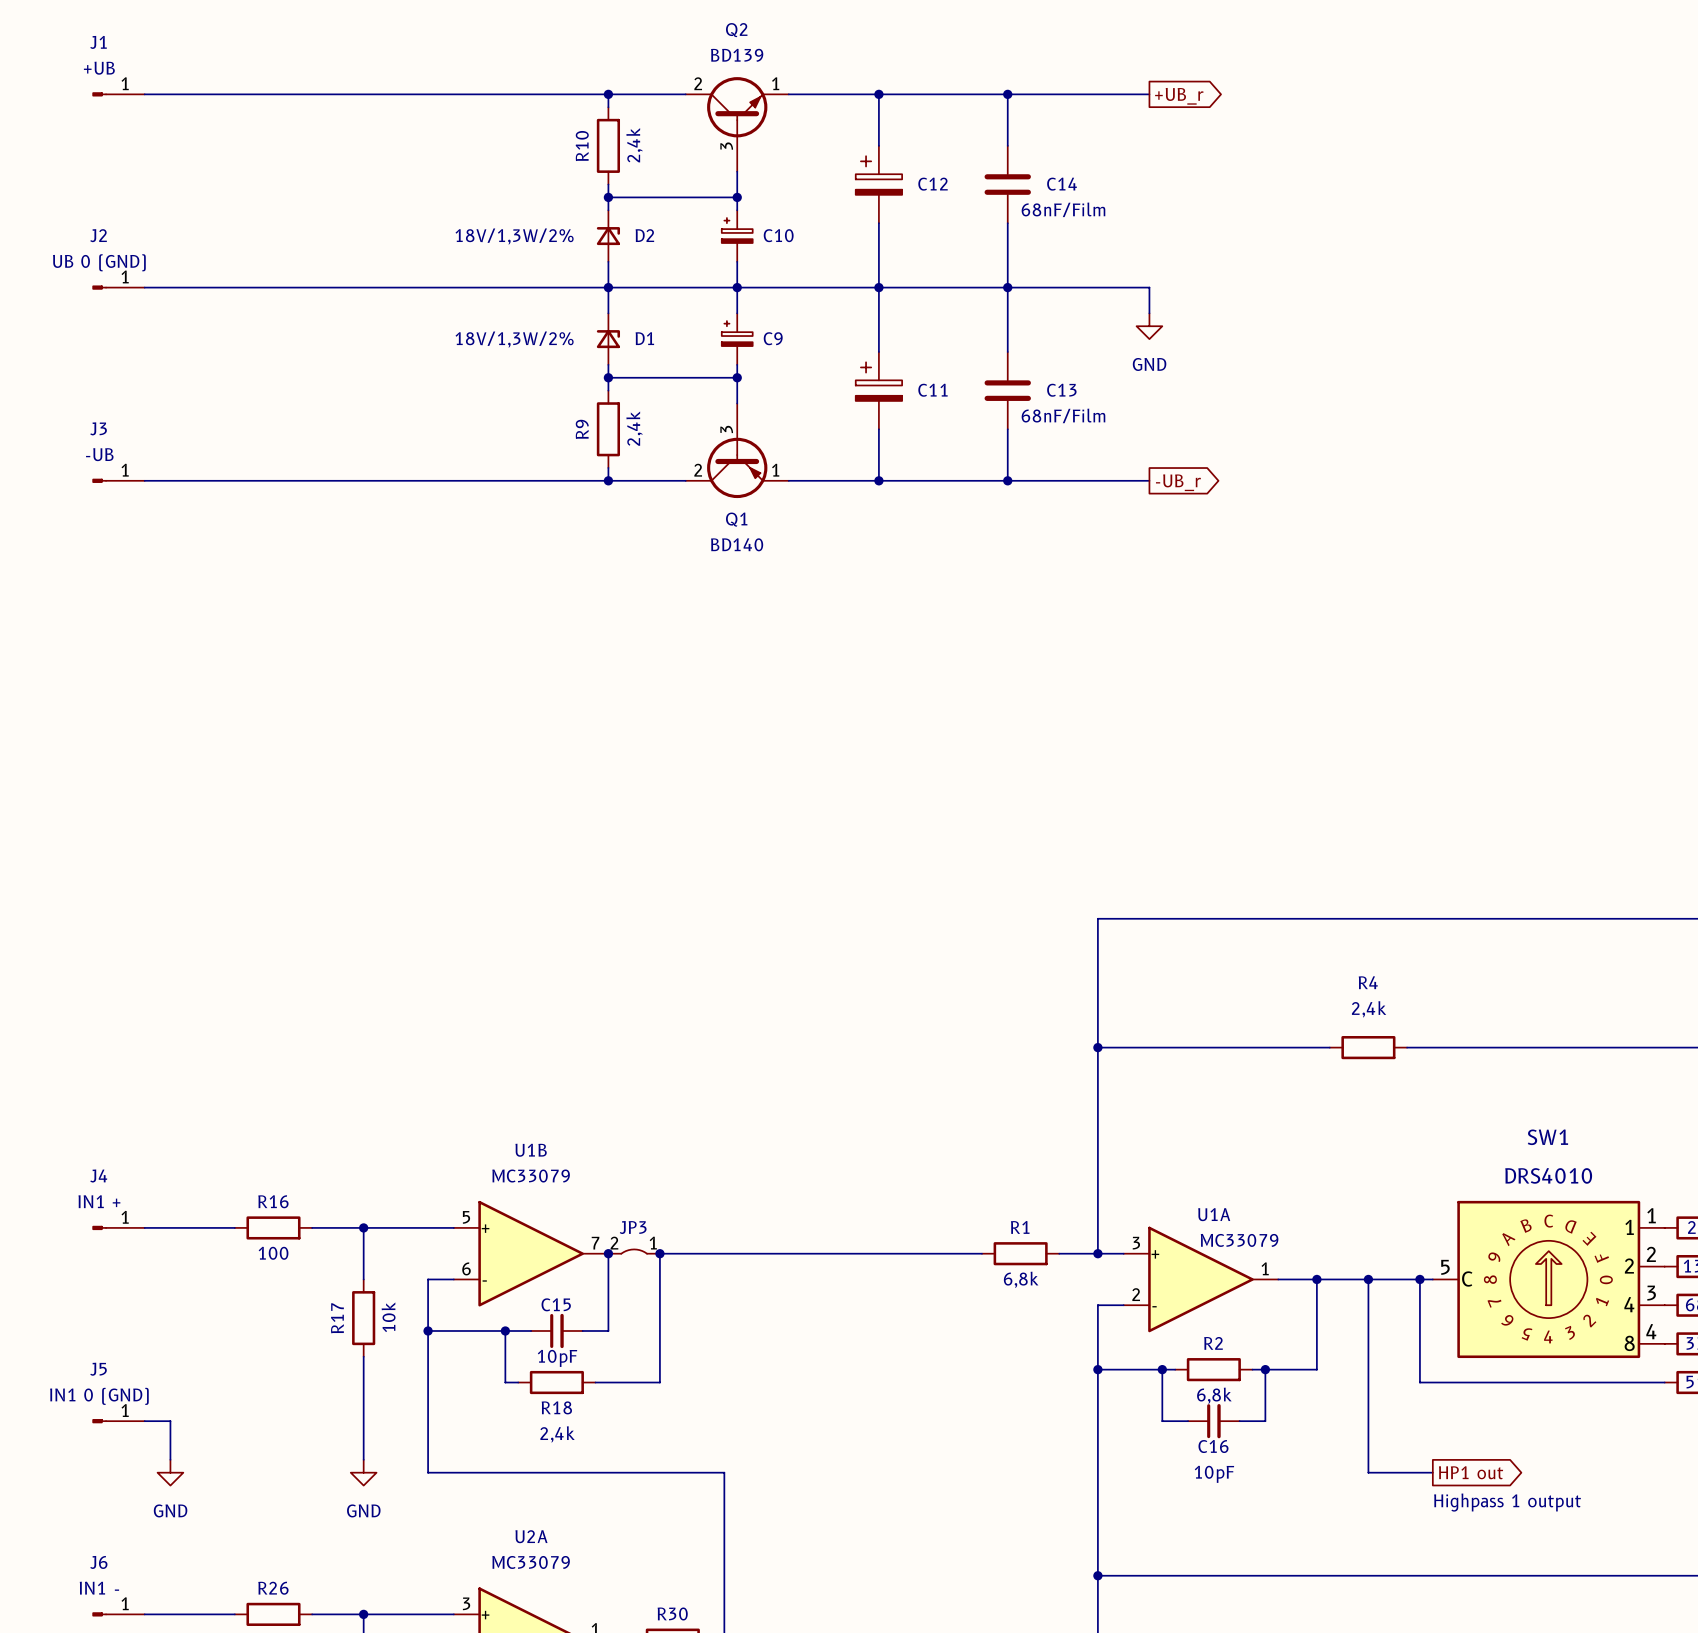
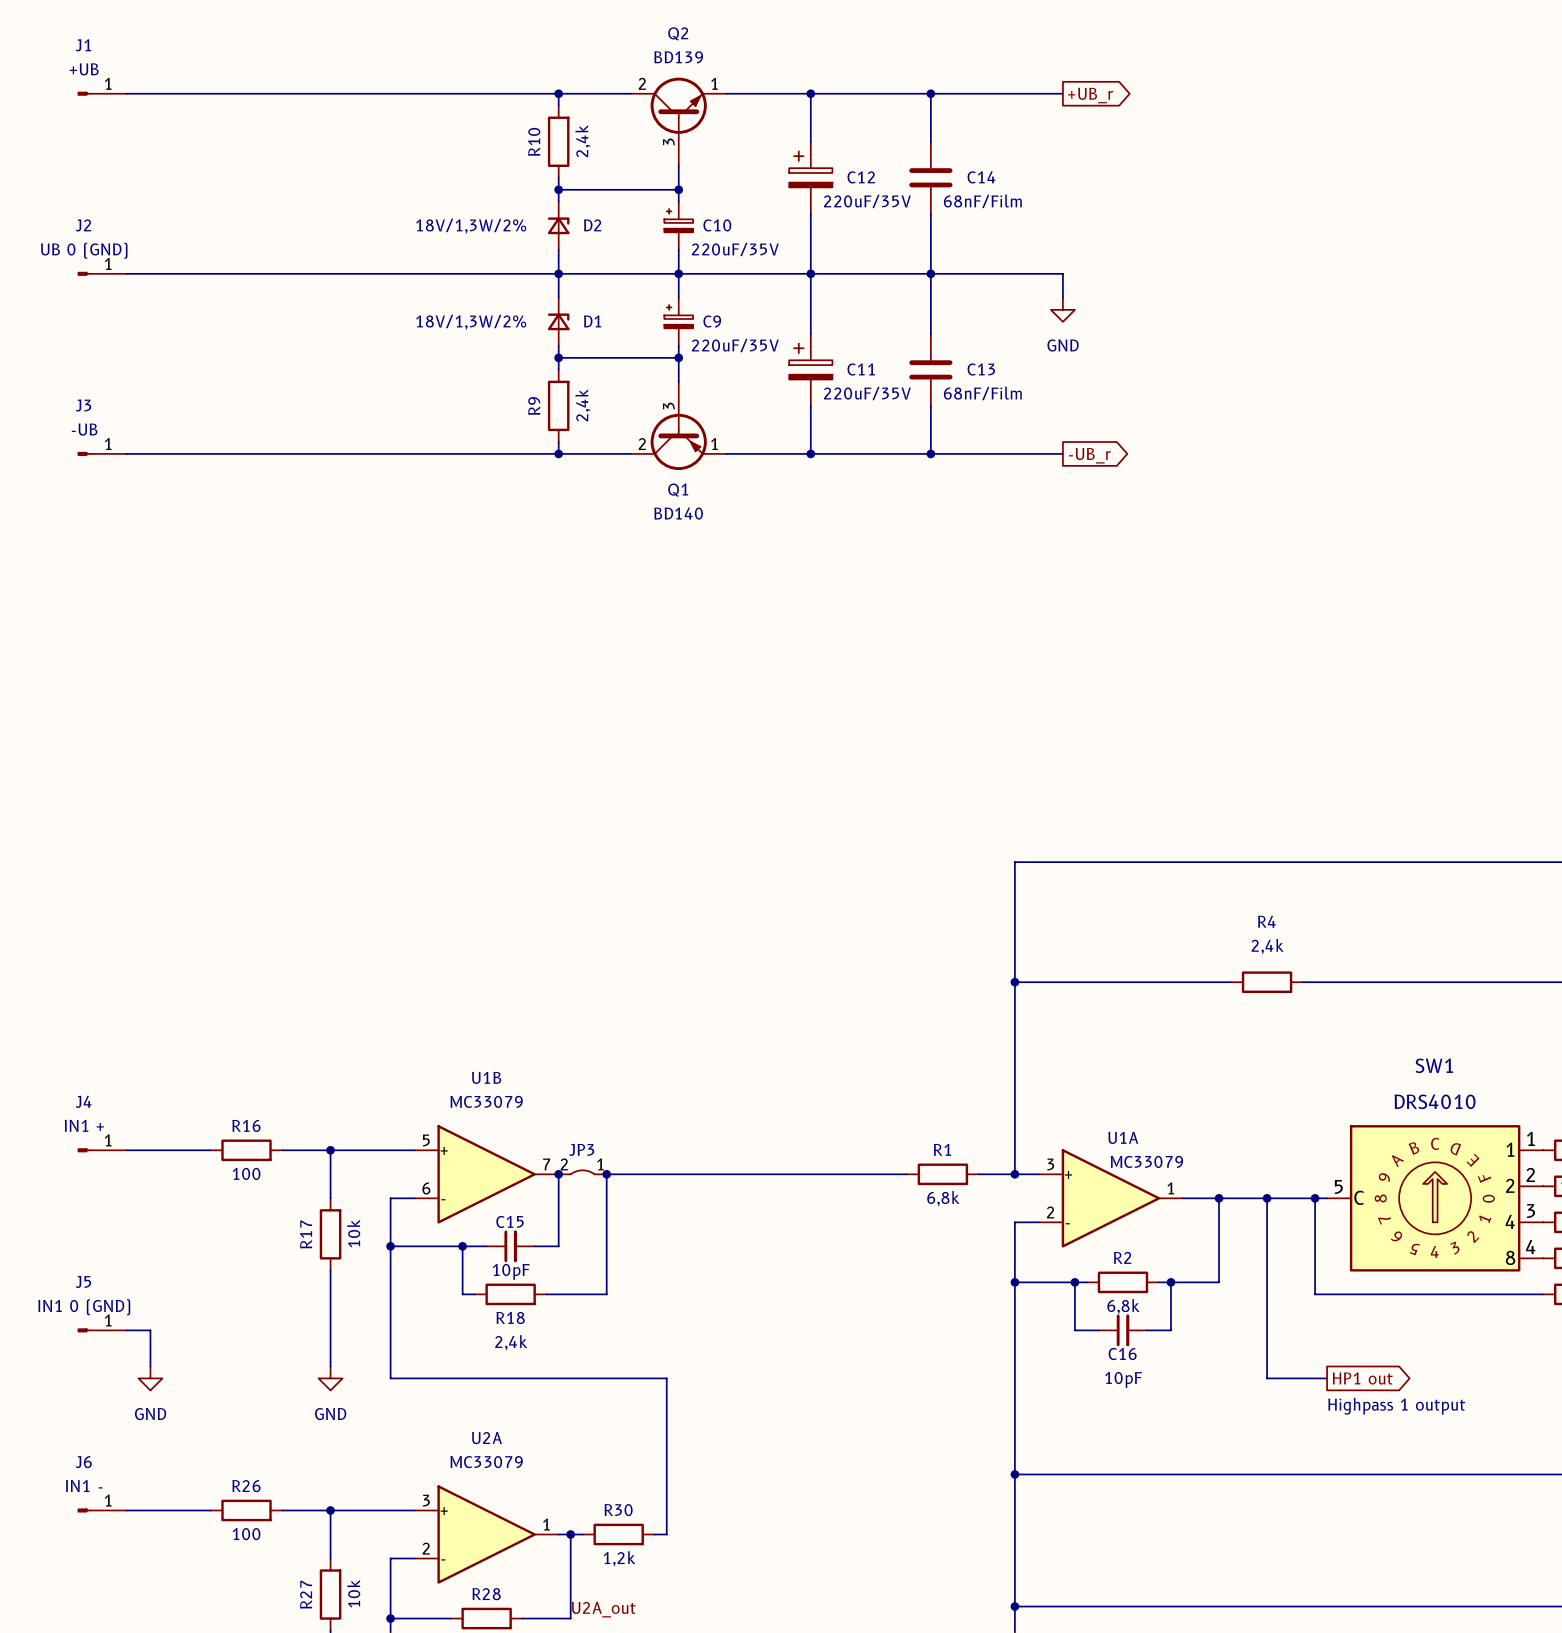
C12 value: none -> 220uF/35V (867, 201)
C10 value: none -> 220uF/35V (735, 249)
C9 value: none -> 220uF/35V (735, 345)
C11 value: none -> 220uF/35V (867, 393)

